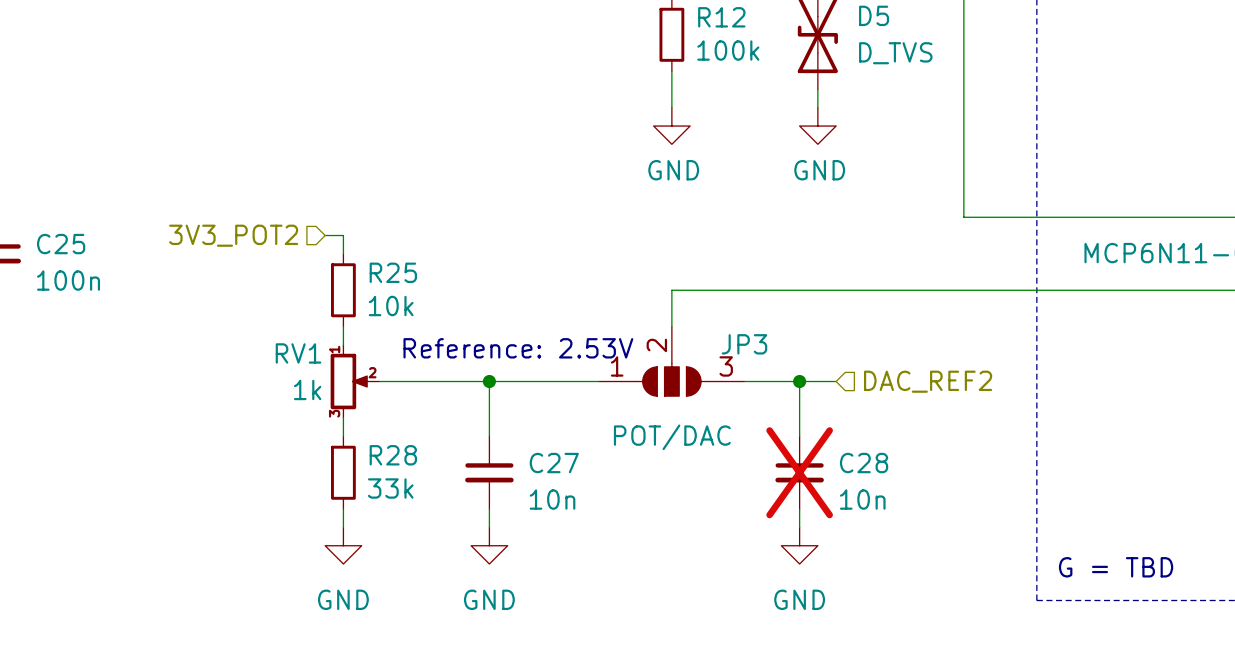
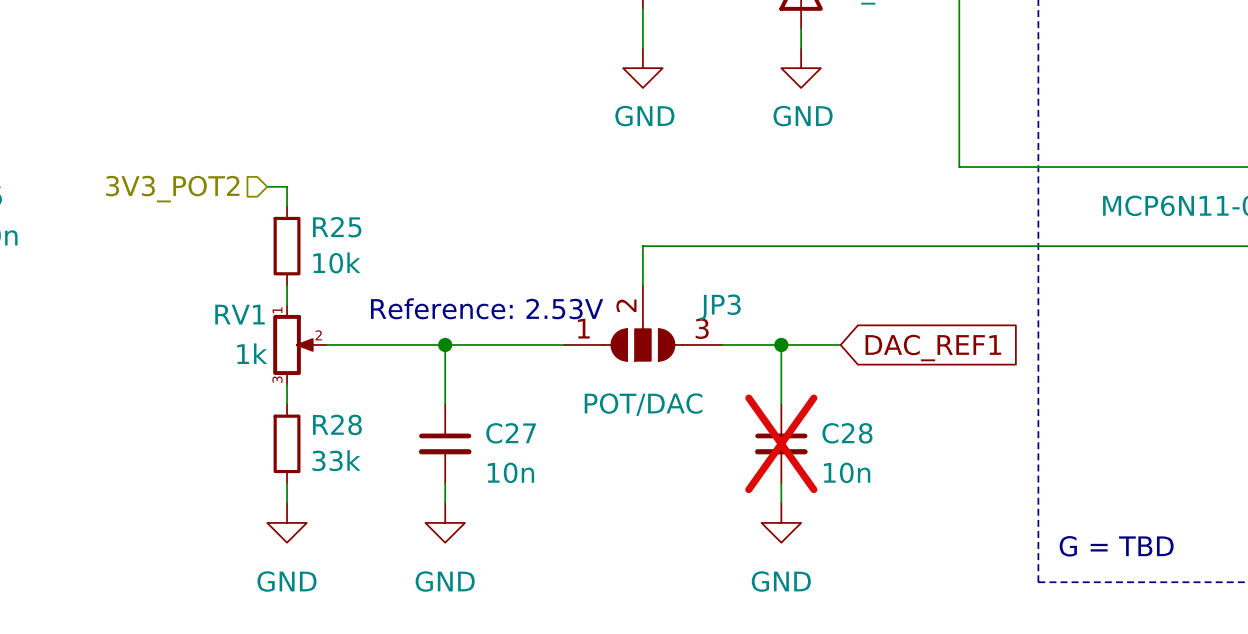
wire: none -> (820, 344) (840, 344)
hierarchical label: DAC_REF2 (928, 381) -> none
global label: none -> DAC_REF1 (933, 348)

